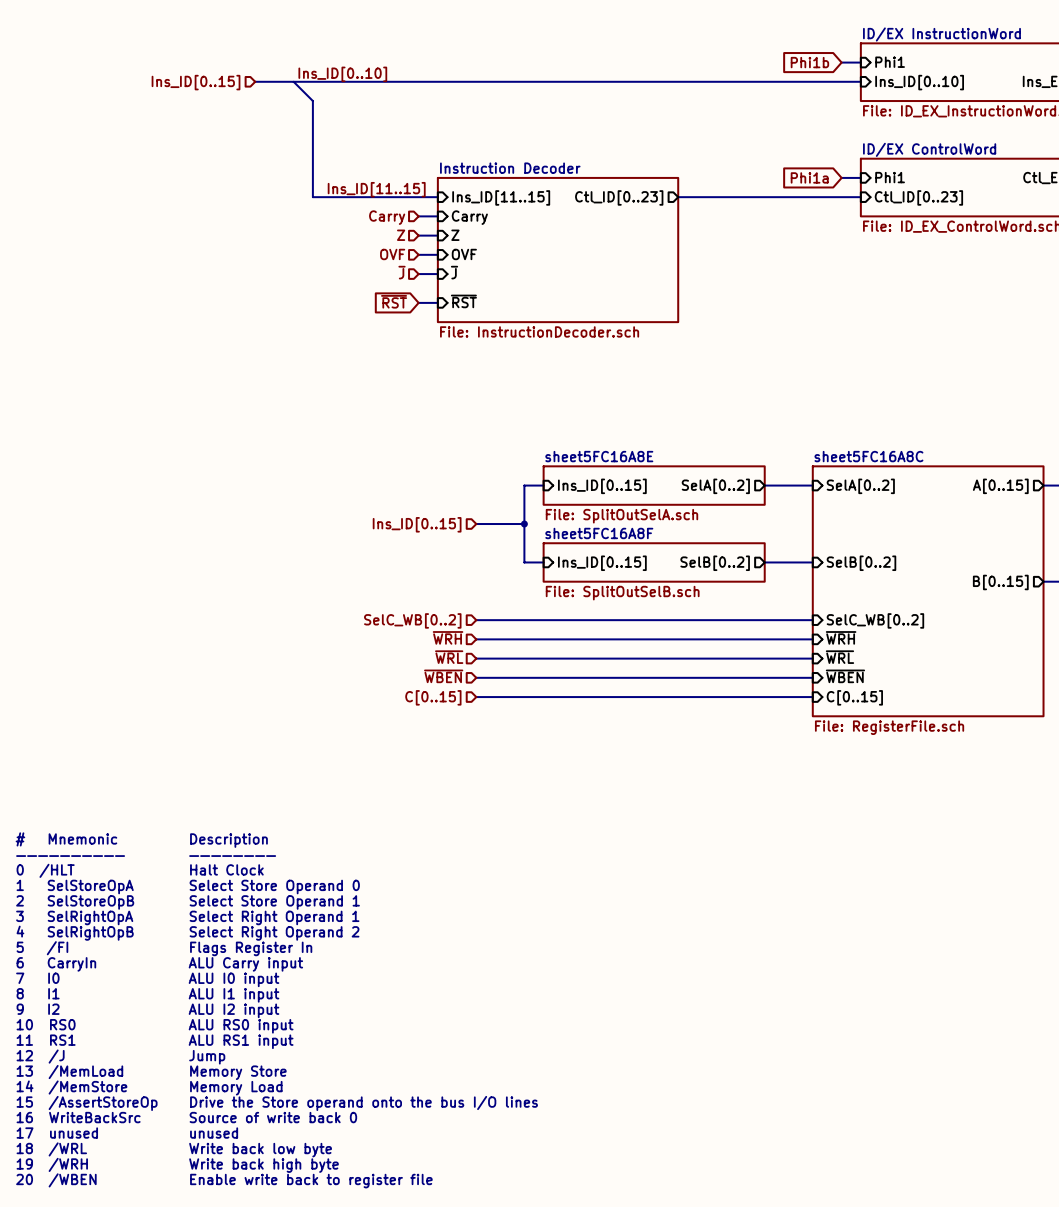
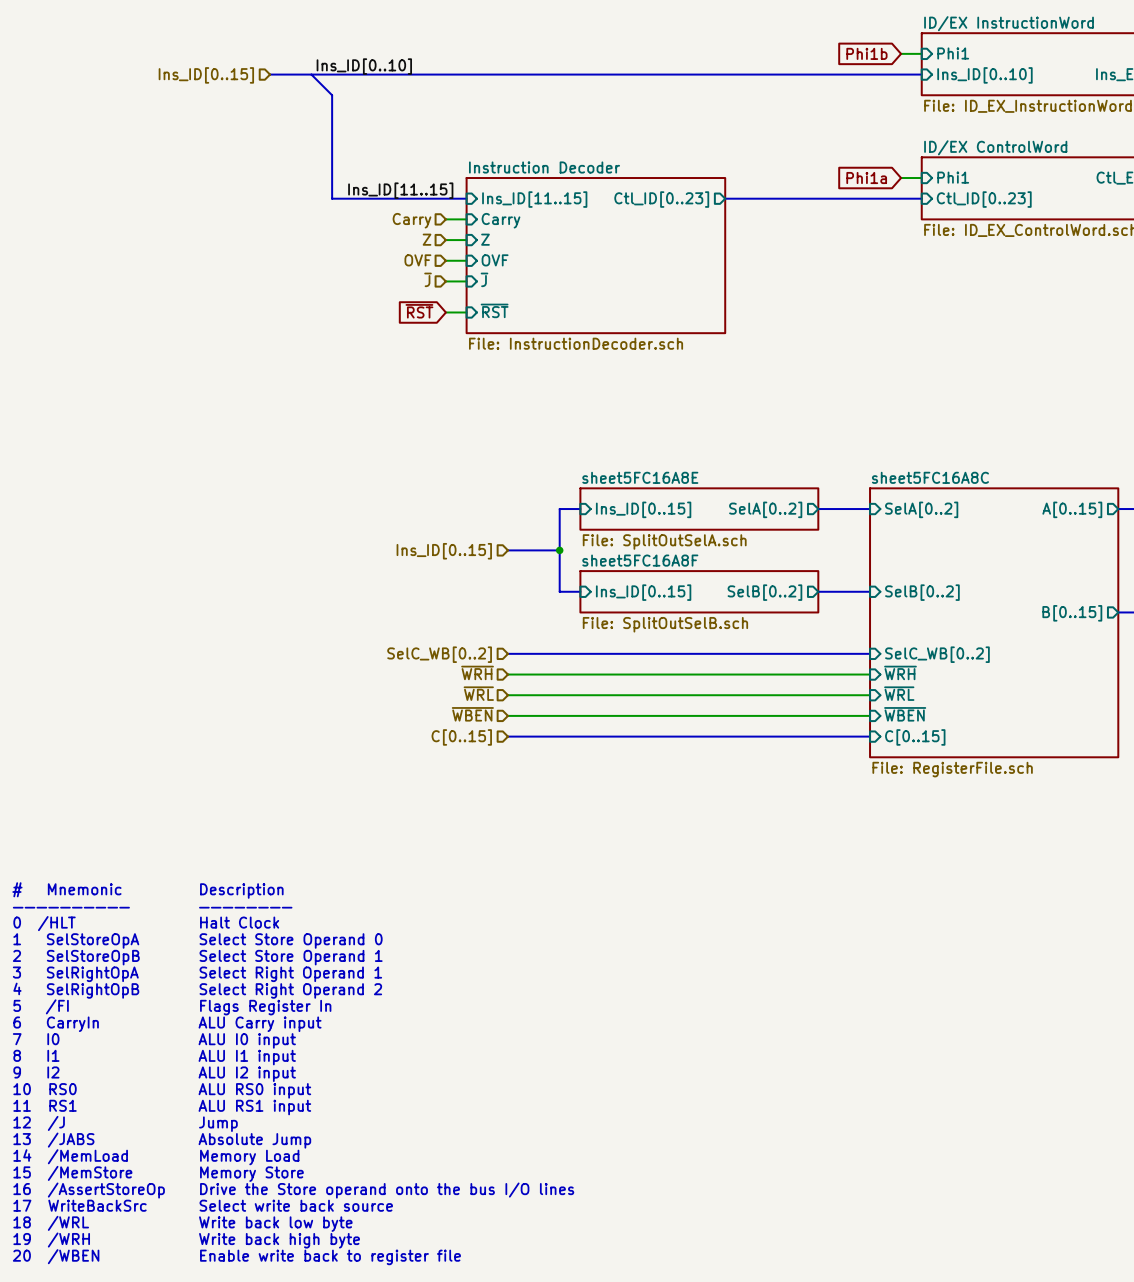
text: 13 /MemLoad (69, 1072) -> 13 /JABS (53, 1140)
text: Memory Store (238, 1072) -> Absolute Jump (254, 1140)
text: 14 /MemStore (71, 1087) -> 14 /MemLoad (70, 1156)
text: 15 /AssertStoreOp (87, 1103) -> 15 /MemStore (72, 1173)
text: Drive the Store operand onto the bus I/O lines (364, 1103) -> Memory Store (251, 1174)
text: 16 WriteBackSrc (78, 1117) -> 16 /AssertStoreOp (89, 1190)
text: Source of write back 0 (273, 1117) -> Drive the Store operand onto the bus I/O lines (387, 1190)
text: 17 unused (57, 1133) -> 17 WriteBackSrc (80, 1205)
text: unused (214, 1133) -> Select write back source (296, 1205)

